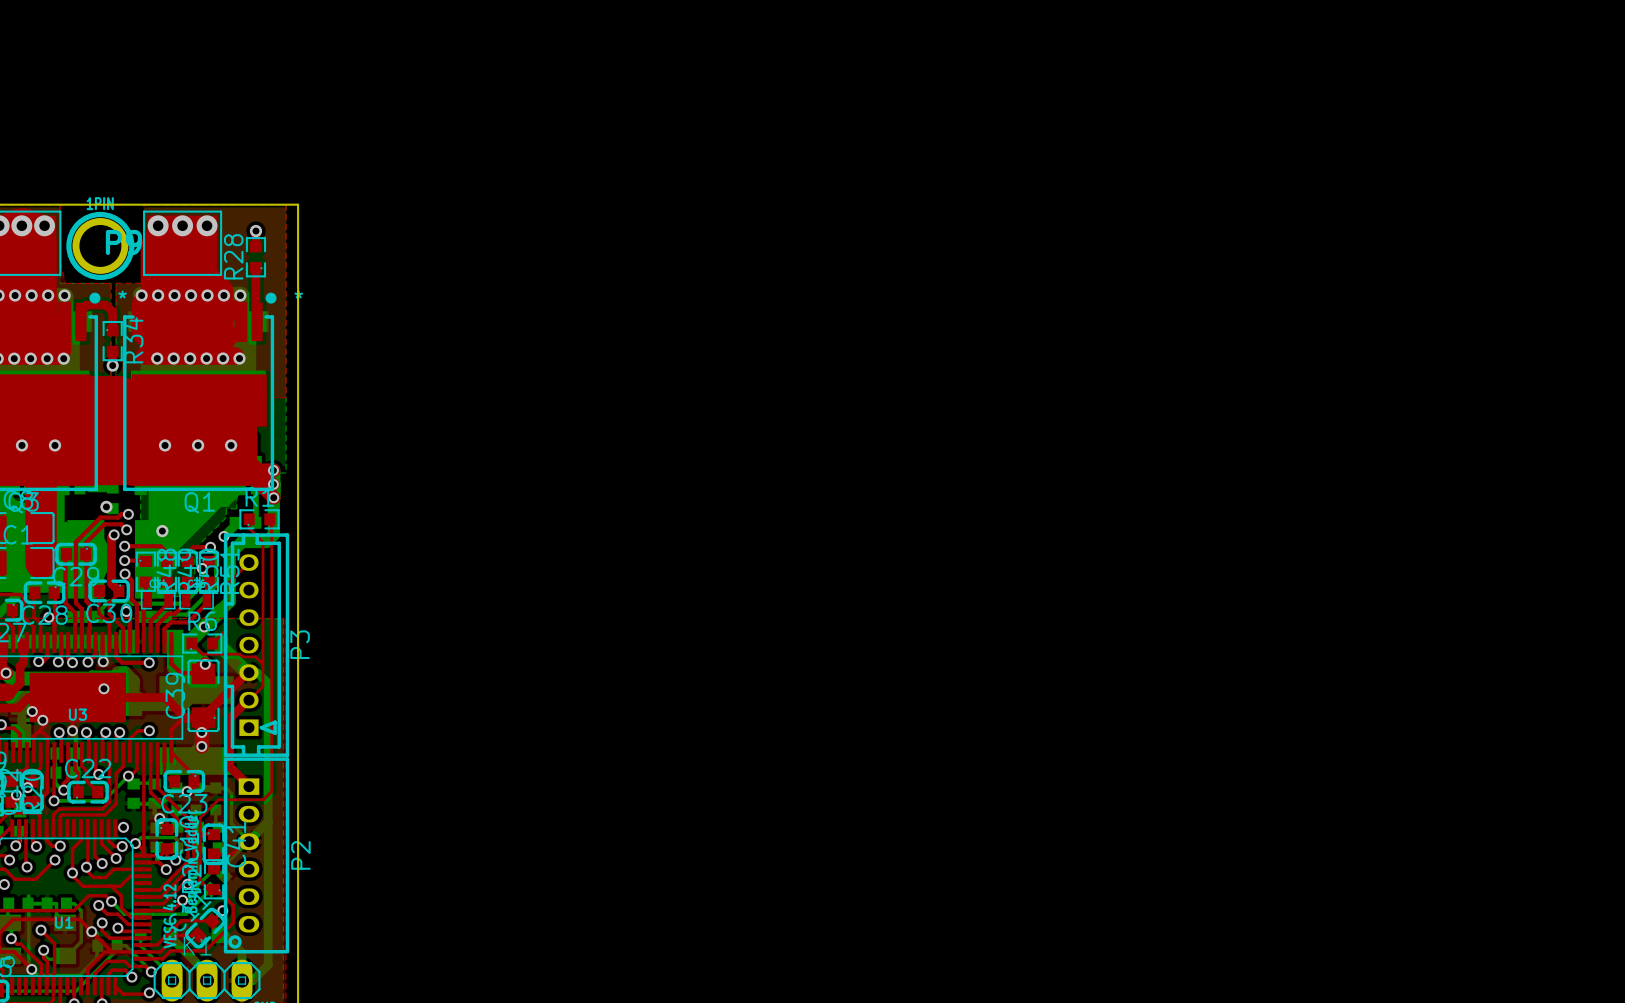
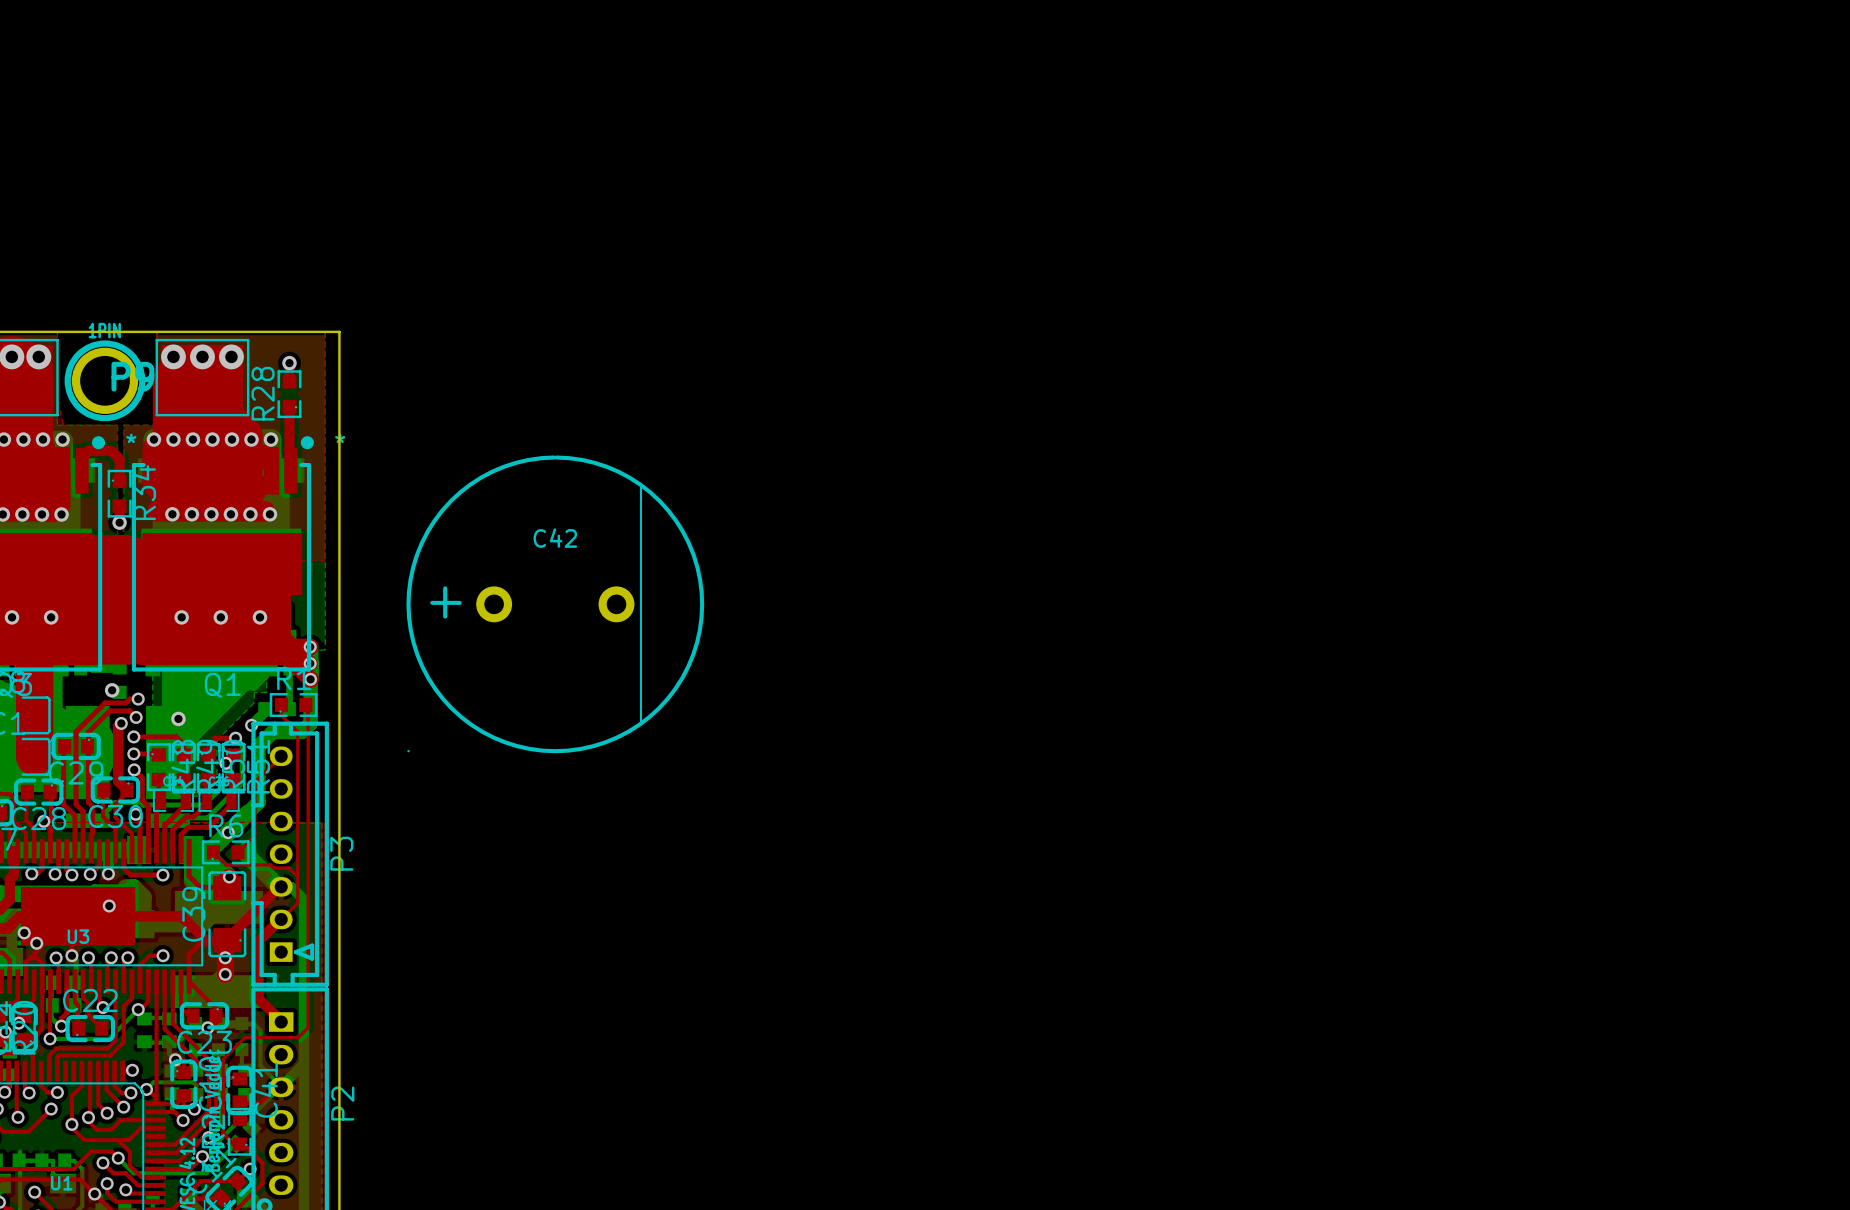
C42: none -> (555, 604)

